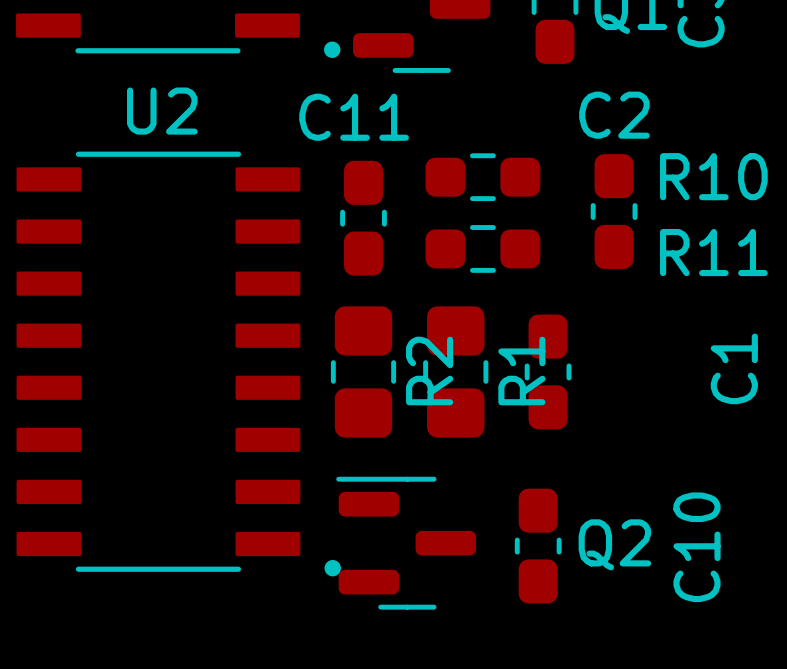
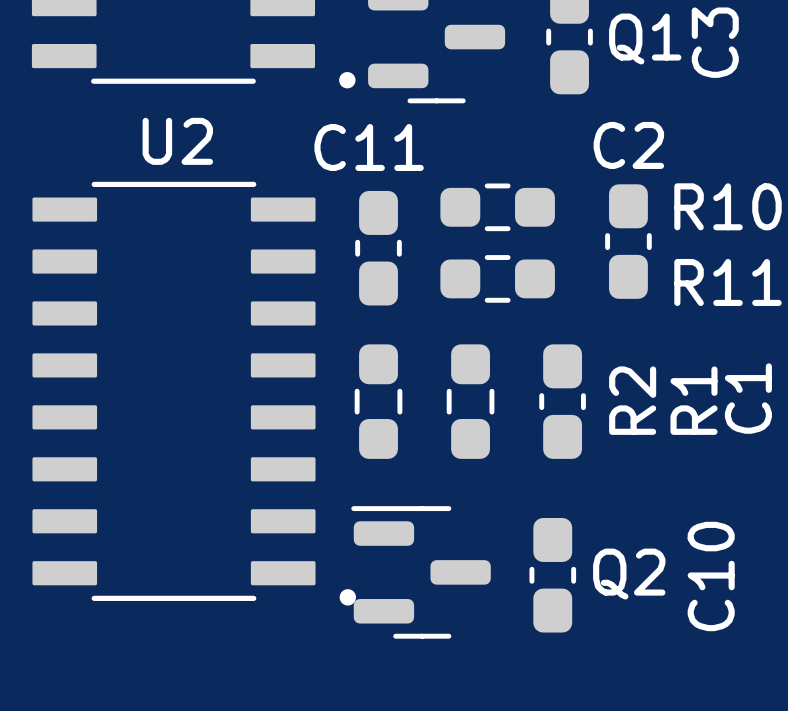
R2 footprint: [330, 306, 397, 438] -> [354, 344, 403, 459]
R1 footprint: [423, 306, 489, 438] -> [446, 344, 495, 459]
R2 name position: R2 (429, 371) -> R2 (632, 400)
R1 name position: R1 (521, 371) -> R1 (694, 400)

